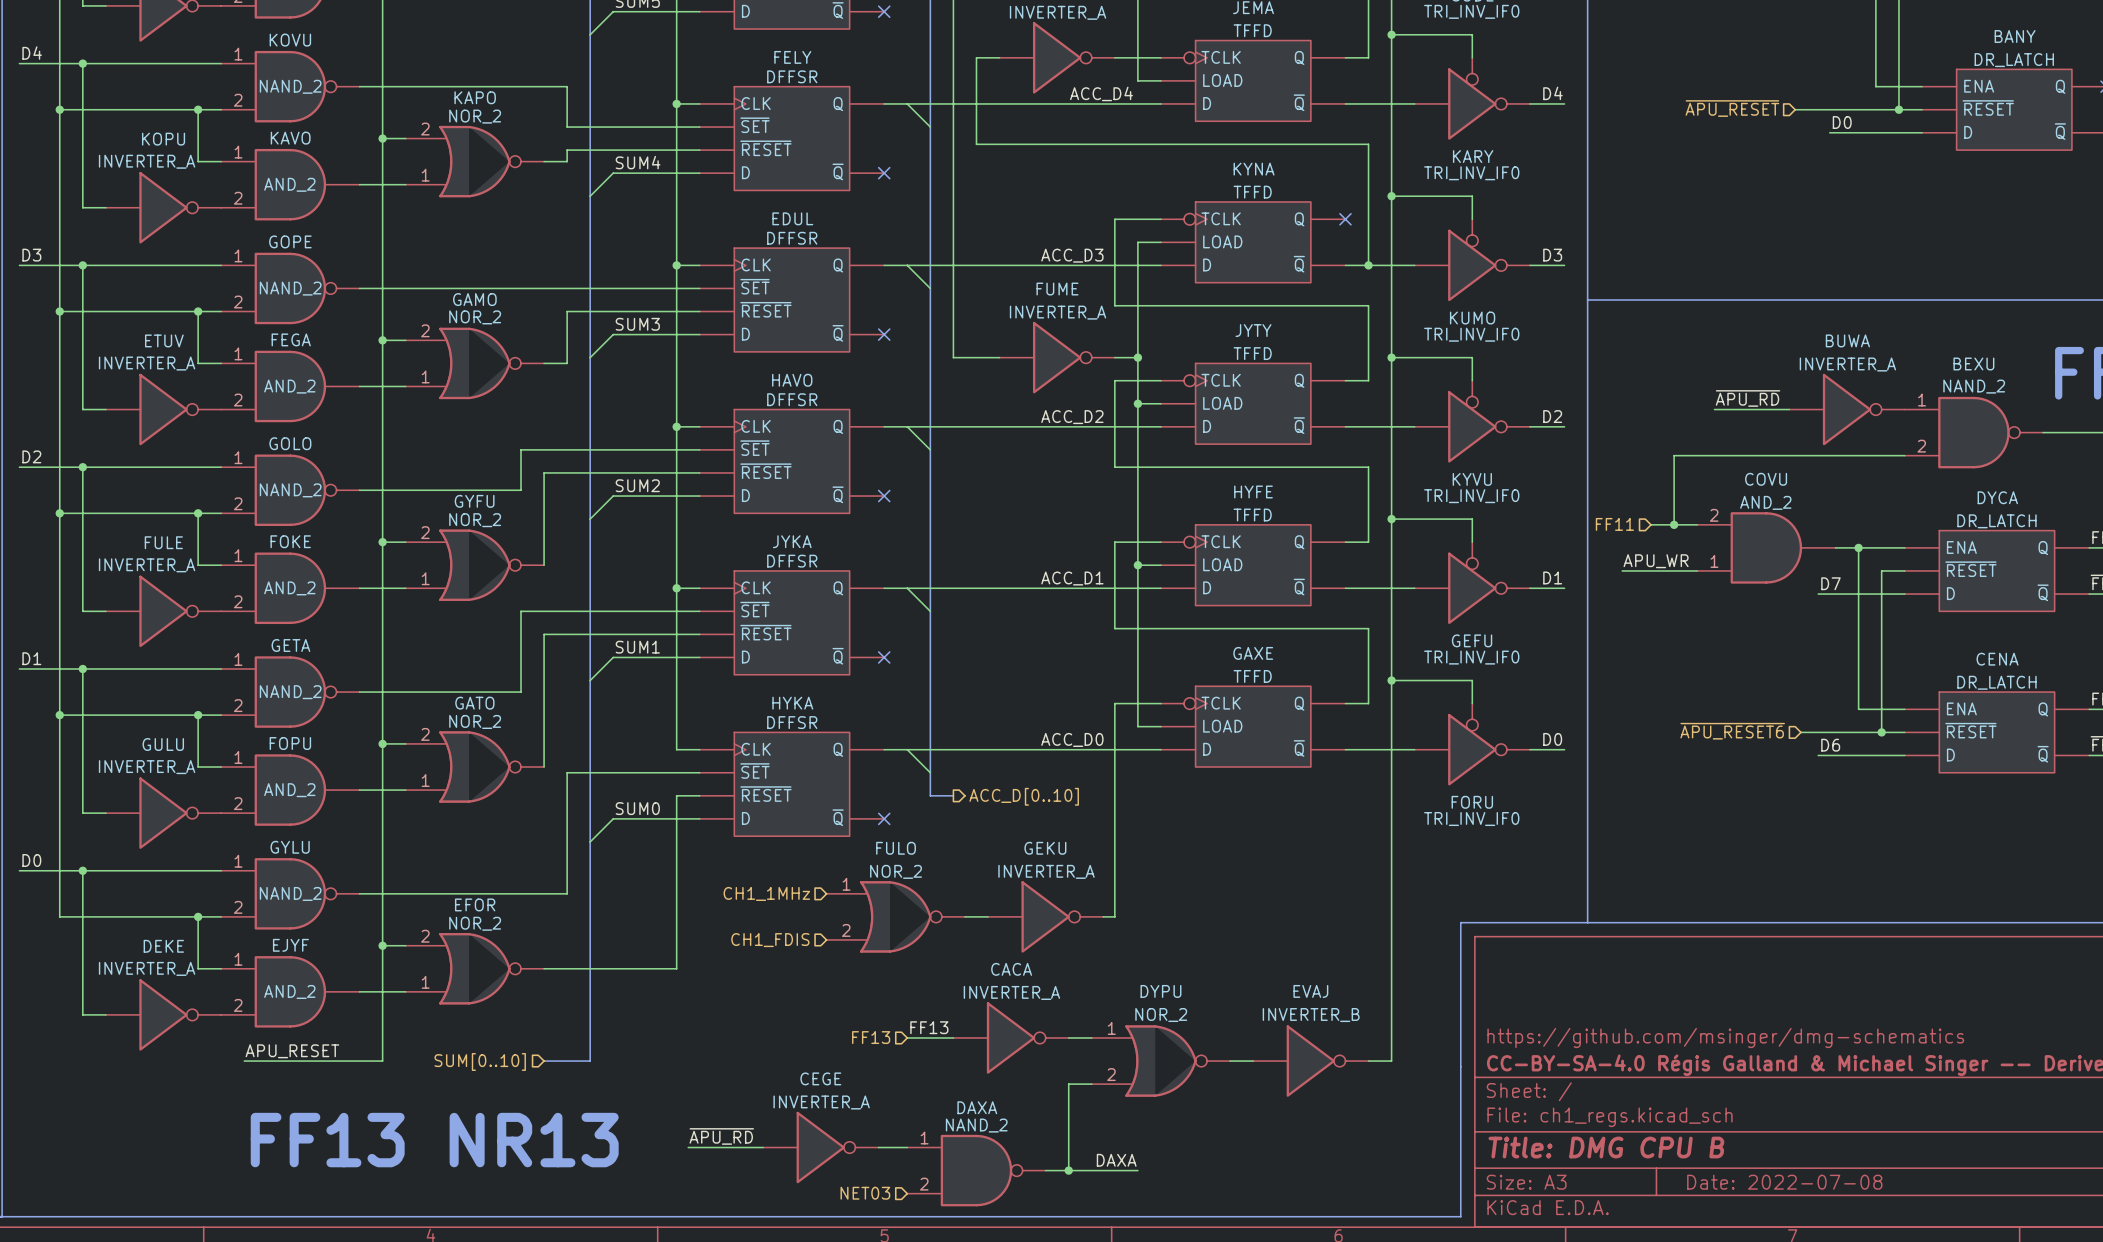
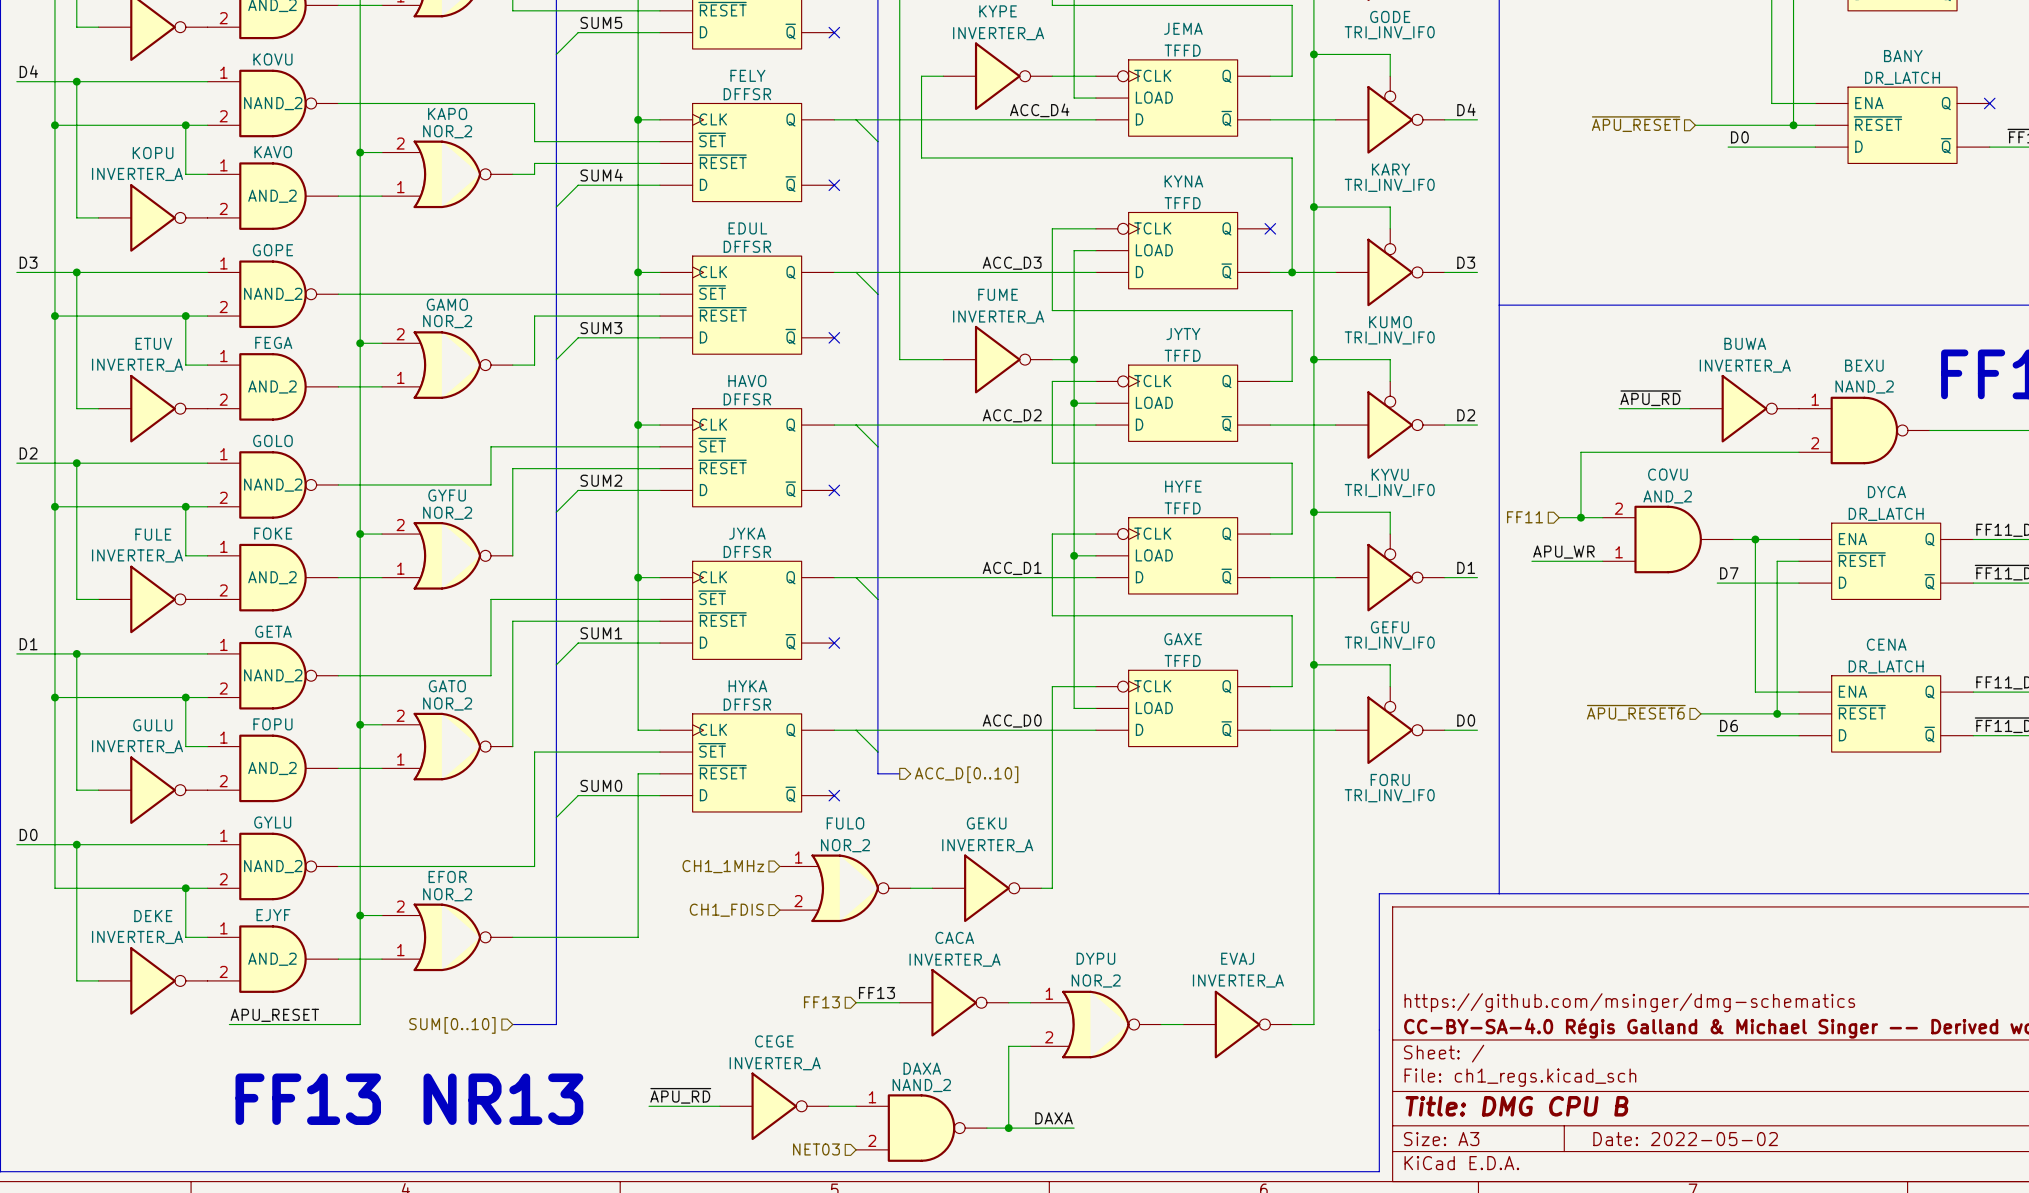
EVAJ value: INVERTER_B (1311, 1015) -> INVERTER_A (1238, 981)
title block: Date: 2022-07-08 (1784, 1182) -> Date: 2022-05-02 (1685, 1139)

